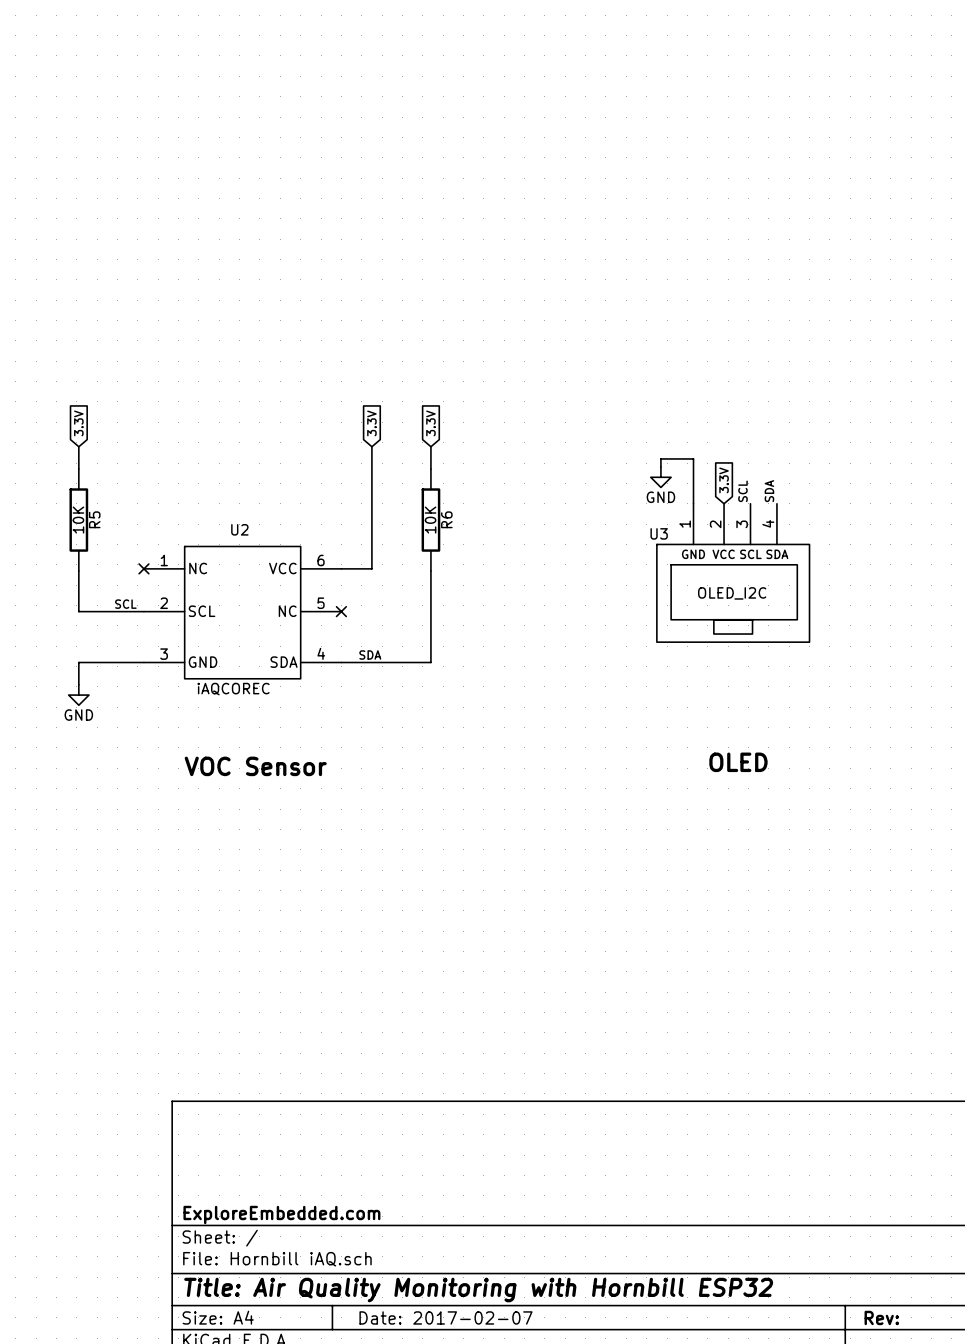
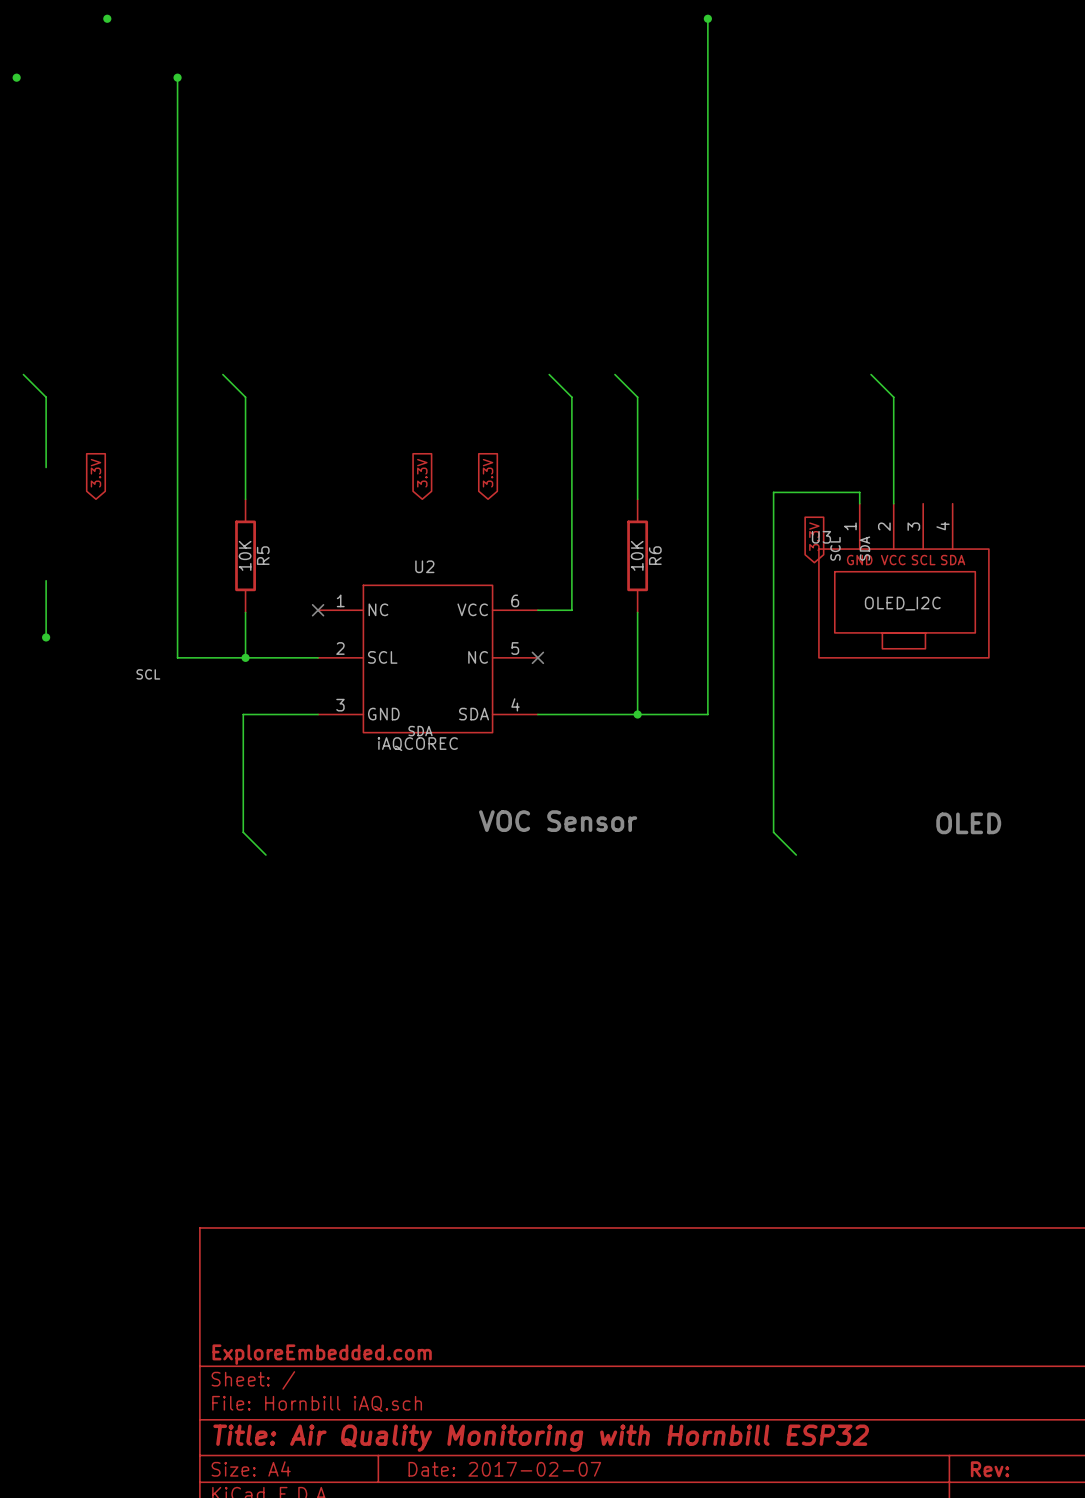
junction: none -> (107, 18)
wire: none -> (707, 18) (707, 714) (537, 714)
junction: none -> (707, 18)
junction: none -> (16, 77)
wire: none -> (177, 77) (177, 657) (318, 657)
junction: none -> (177, 77)
wire: none -> (23, 374) (46, 397) (46, 467)
wire: none -> (222, 374) (245, 397) (245, 499)
wire: none -> (549, 374) (571, 397) (571, 610) (537, 610)
wire: none -> (614, 374) (637, 397) (637, 499)
wire: none -> (871, 374) (893, 397) (893, 503)
wire: (78, 446) (78, 469) -> none
wire: (371, 446) (371, 568) (341, 568) -> none
wire: (430, 446) (430, 469) -> none
wire: none -> (859, 503) (859, 492) (773, 492) (773, 832) (796, 855)
wire: (660, 467) (660, 458) (693, 458) (693, 503) -> none
power symbol: GND (660, 477) -> none
wire: none -> (46, 580) (46, 637)
R5 position: (78, 520) -> (245, 555)
R6 position: (430, 520) -> (637, 555)
no-connect mark: none -> (318, 610)
wire: none -> (245, 612) (245, 657)
wire: none -> (637, 612) (637, 714)
no-connect mark: (143, 568) -> none
junction: none -> (46, 637)
wire: (78, 570) (78, 611) (143, 611) -> none
wire: (430, 570) (430, 662) (341, 662) -> none
U3 position: (733, 572) -> (903, 580)
junction: none -> (245, 657)
no-connect mark: none -> (537, 657)
no-connect mark: (341, 611) -> none
U2 position: (242, 612) -> (427, 658)
wire: none -> (318, 714) (243, 714) (243, 832) (265, 855)
junction: none -> (637, 714)
wire: (143, 662) (78, 662) (78, 684) -> none
power symbol: GND (78, 695) -> none
text: none -> VOC Sensor (558, 821)
text position: OLED (738, 762) -> OLED (968, 823)
text: VOC Sensor (255, 766) -> none

